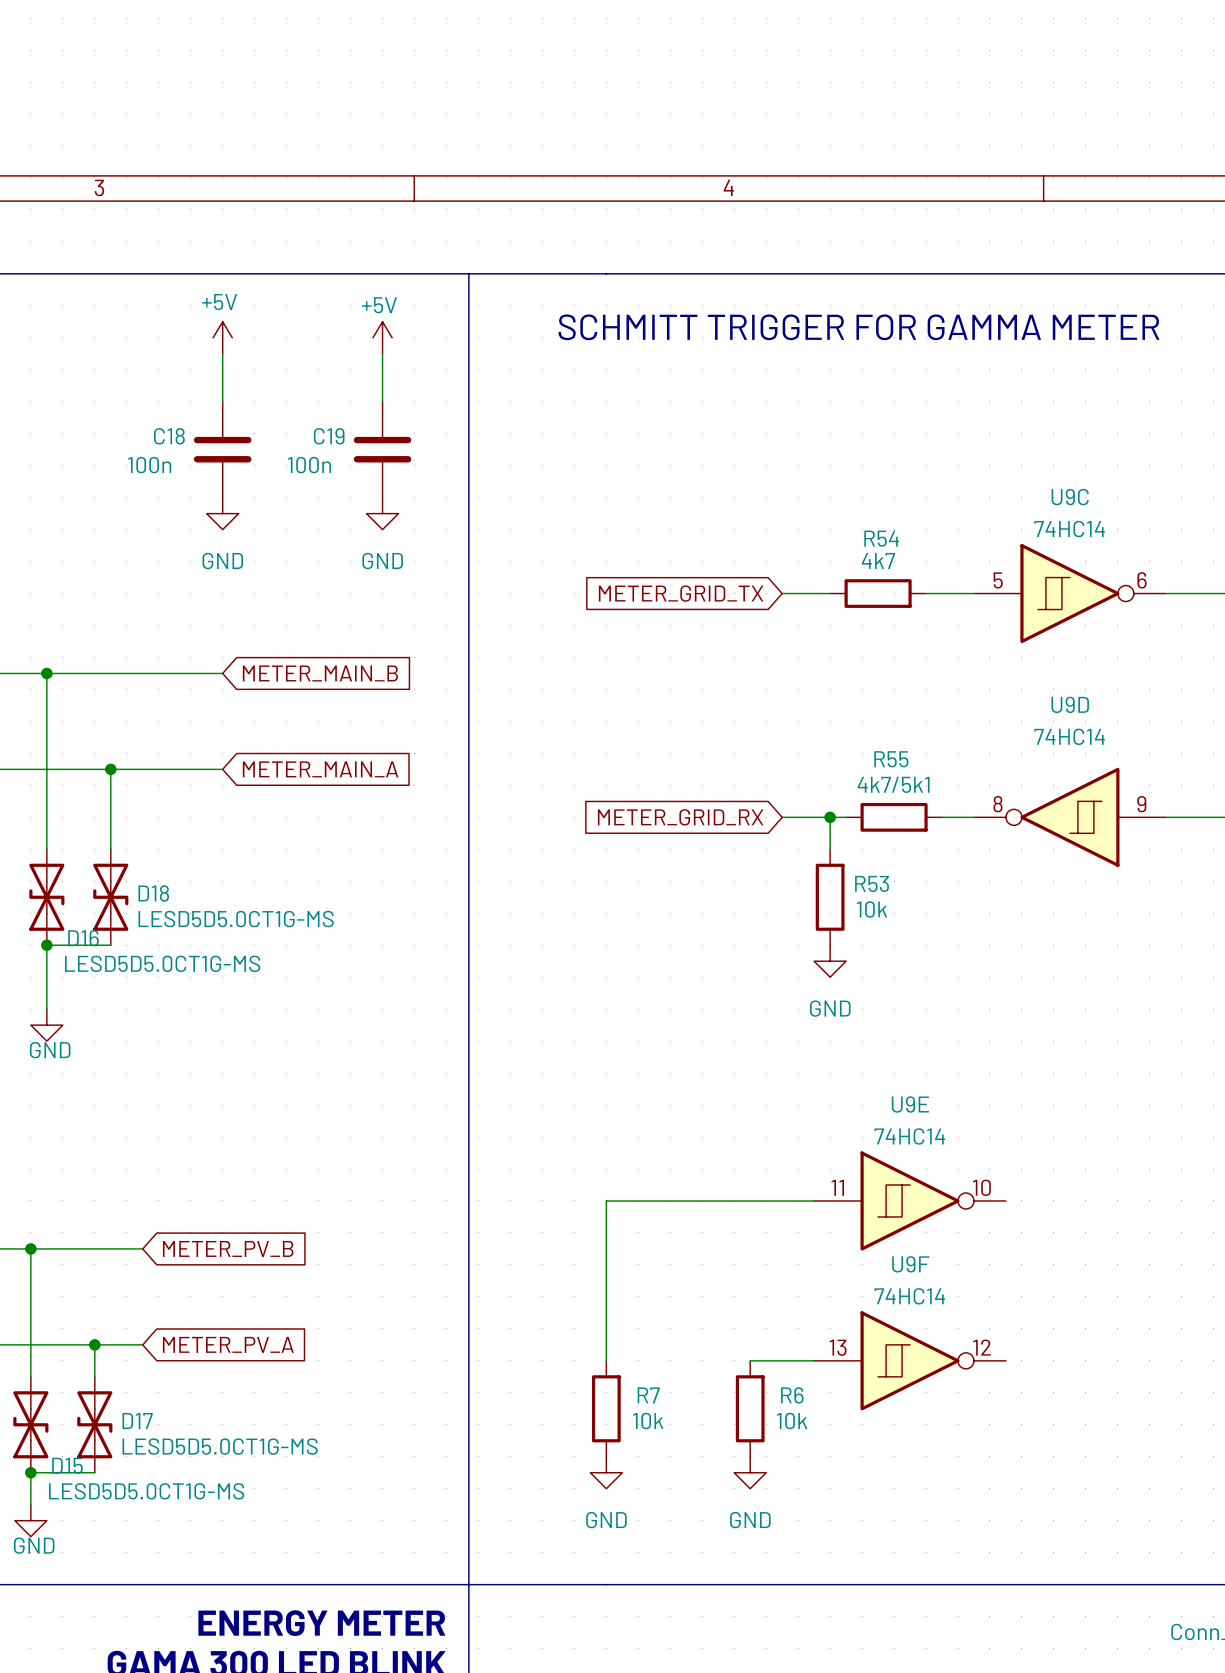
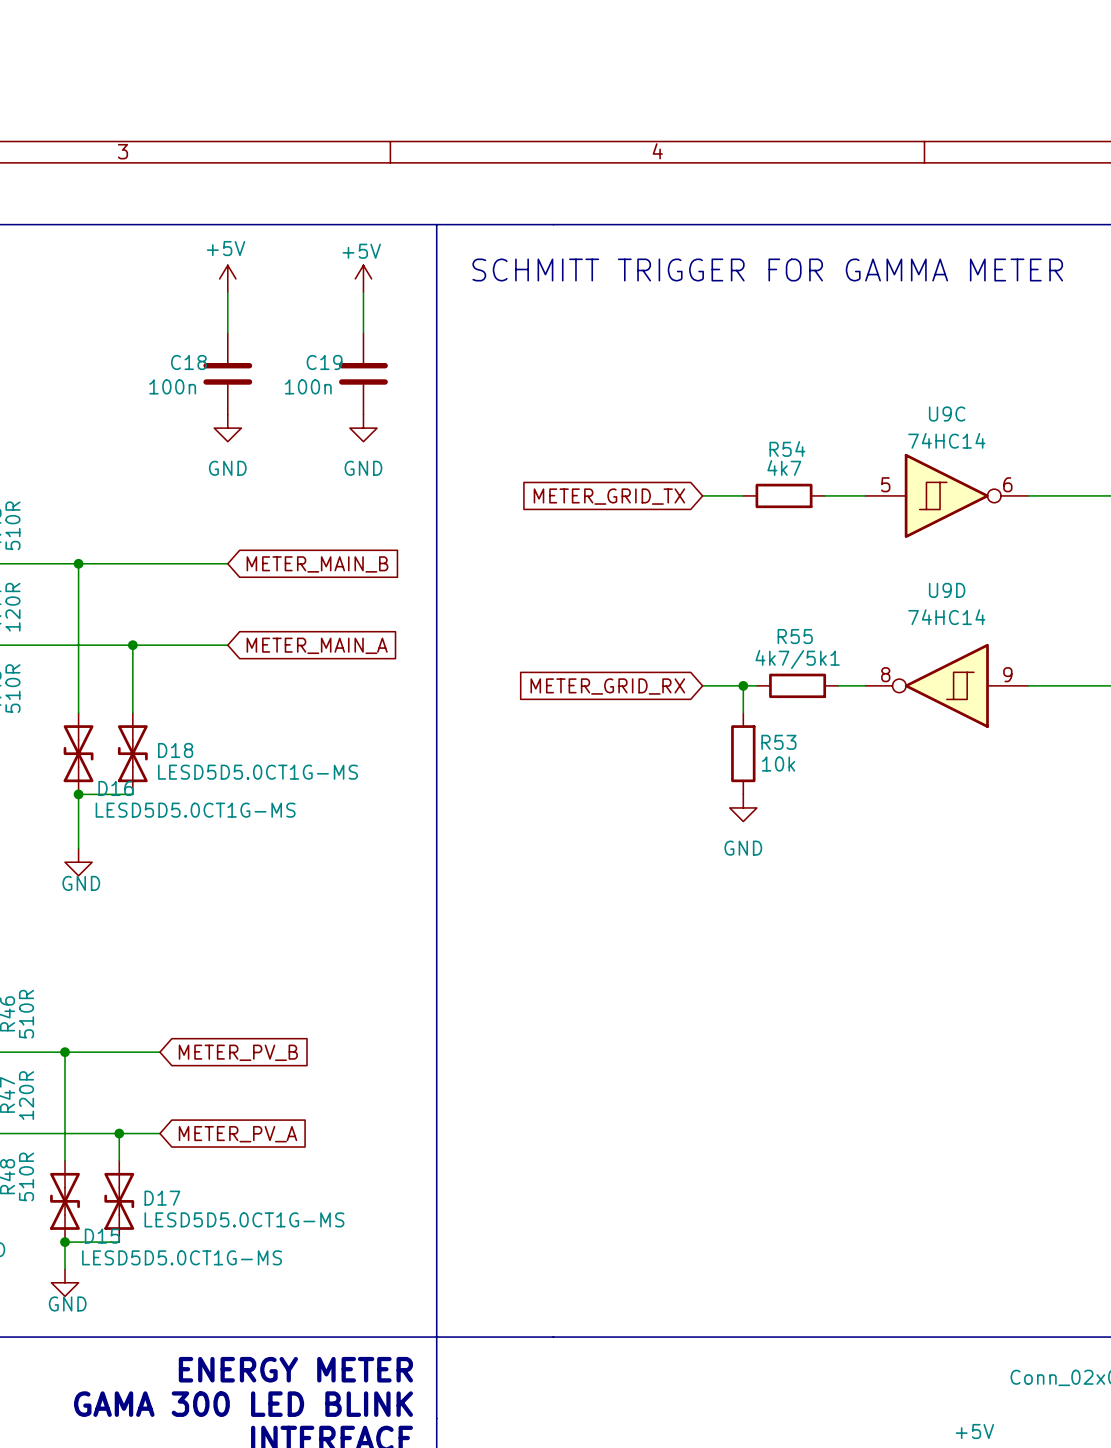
wire: (814, 1200) (606, 1200) (606, 1360) -> none
U9E: 74HC14 (910, 1200) -> none
wire: (750, 1360) (814, 1360) -> none
U9F: 74HC14 (910, 1360) -> none
R7: 10k (606, 1408) -> none
R6: 10k (750, 1408) -> none
power symbol: GND (606, 1472) -> none
power symbol: GND (750, 1472) -> none

